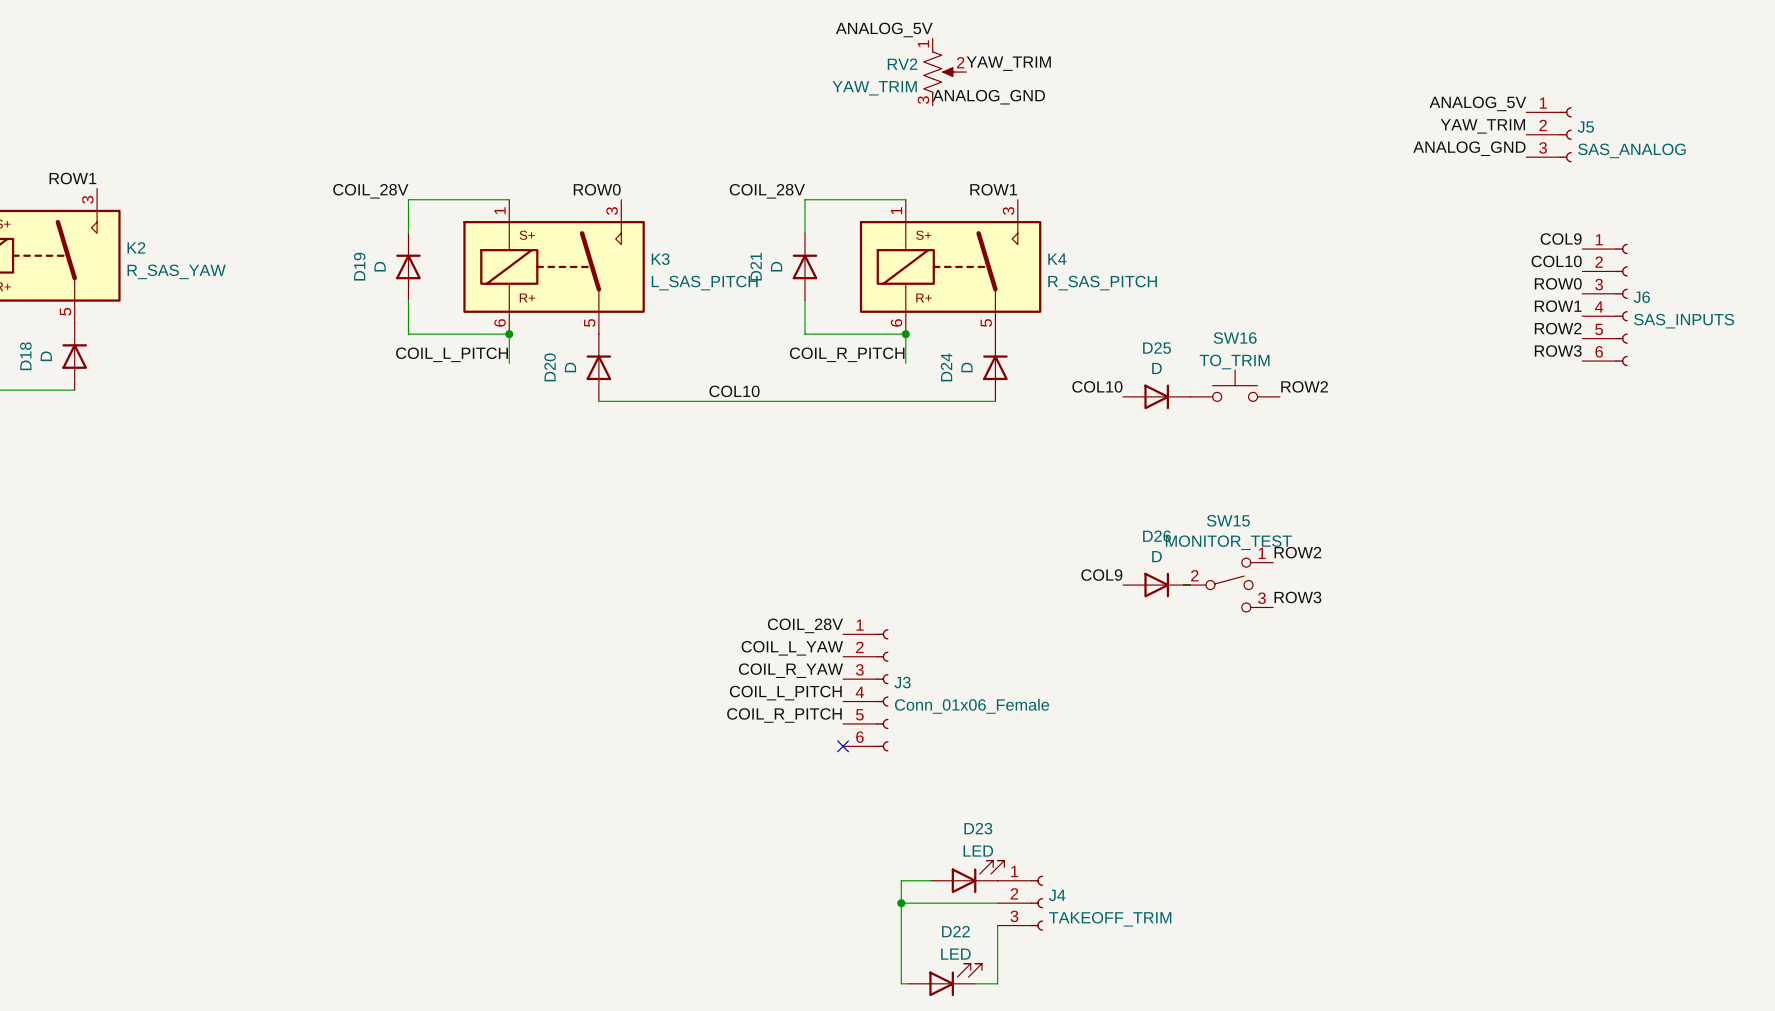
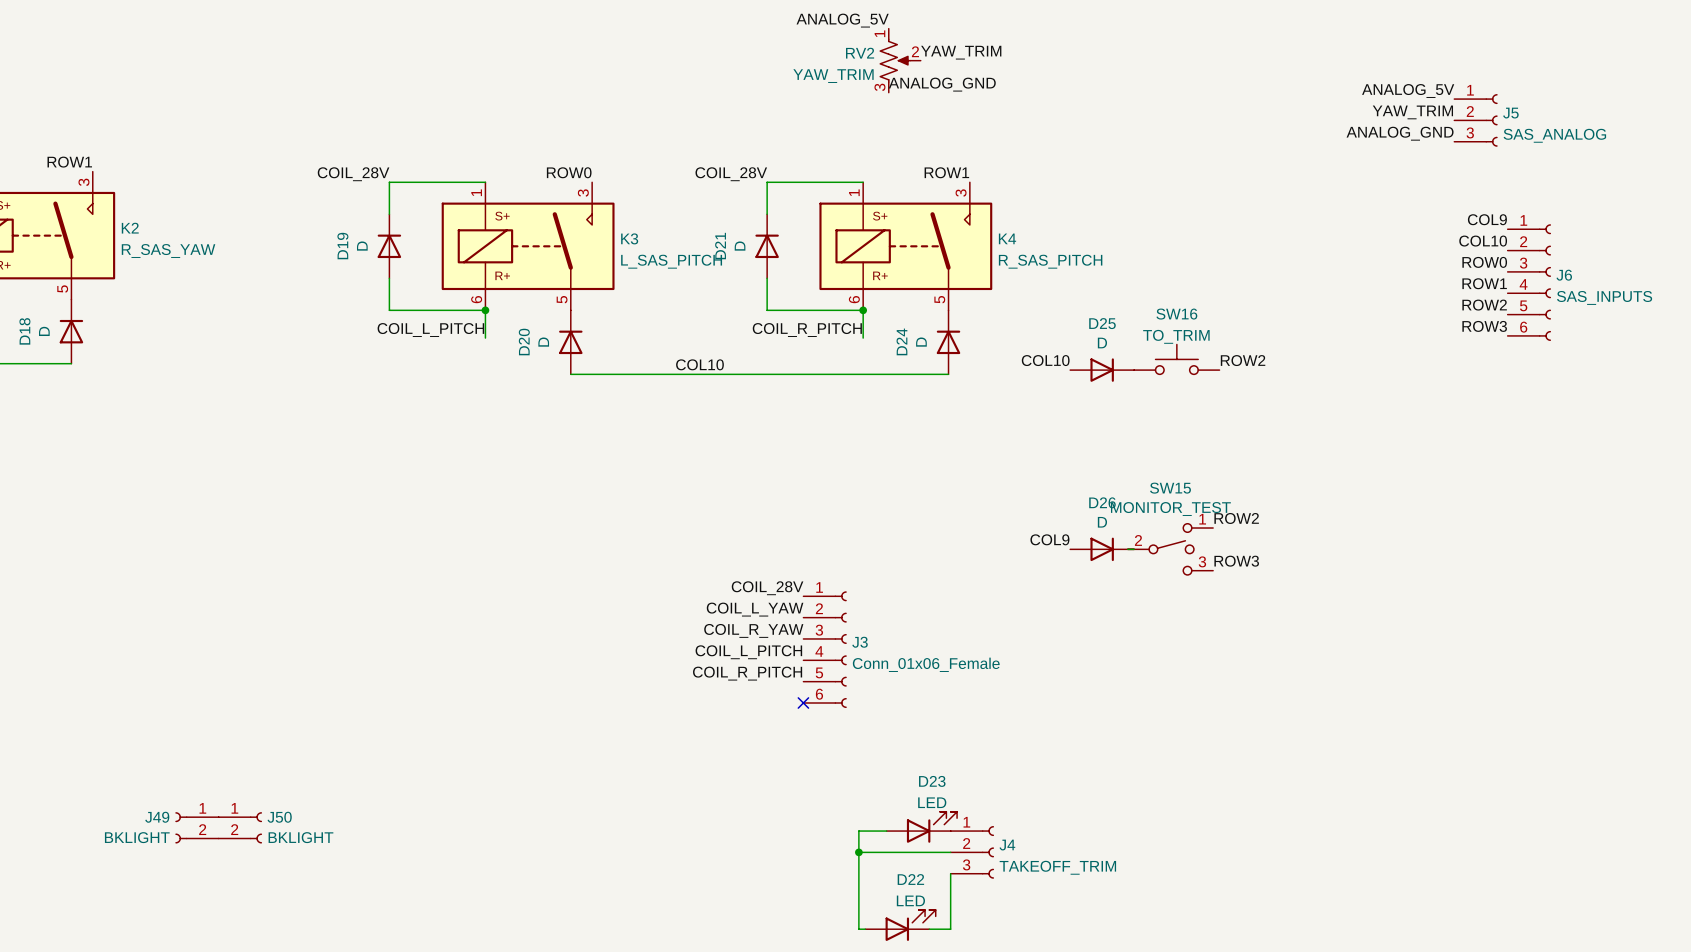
J49: none -> BKLIGHT (197, 827)
J50: none -> BKLIGHT (240, 827)

